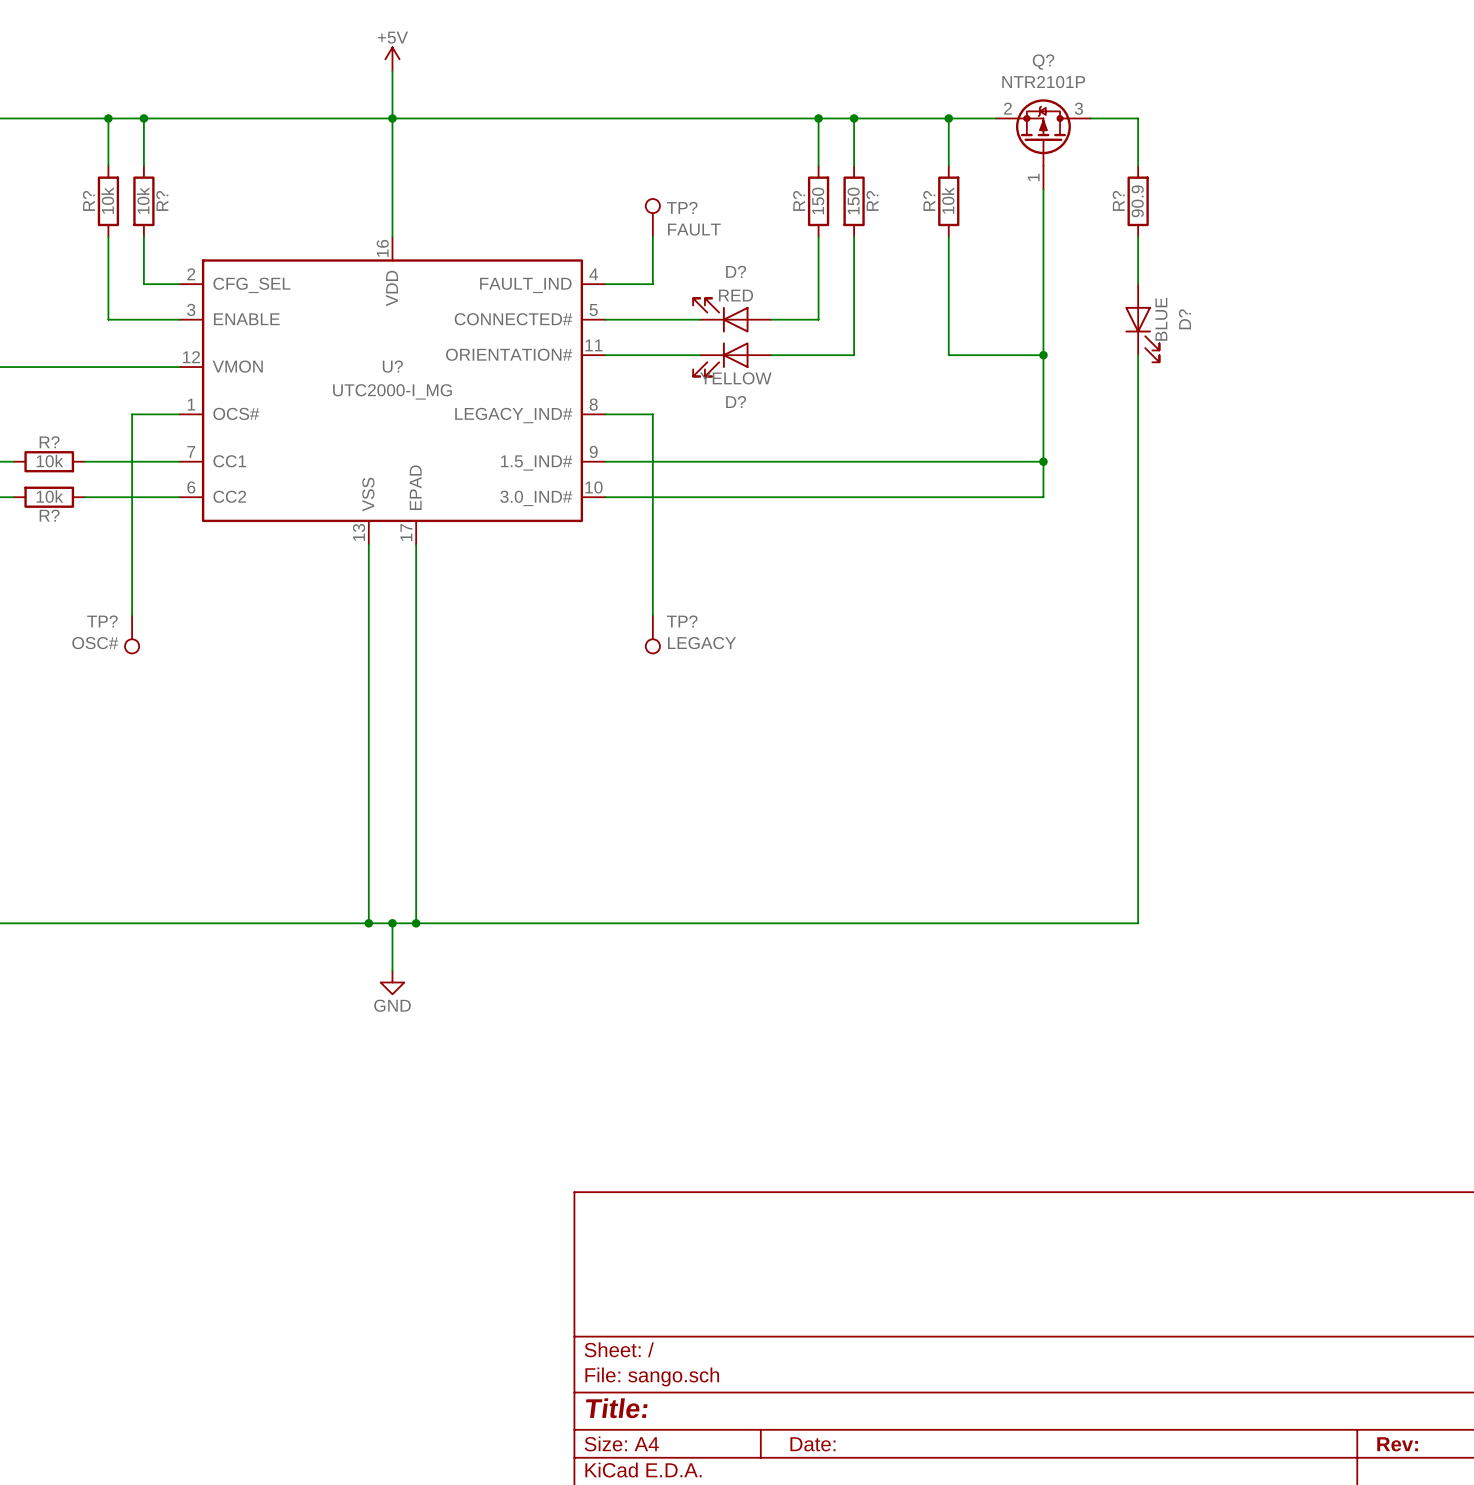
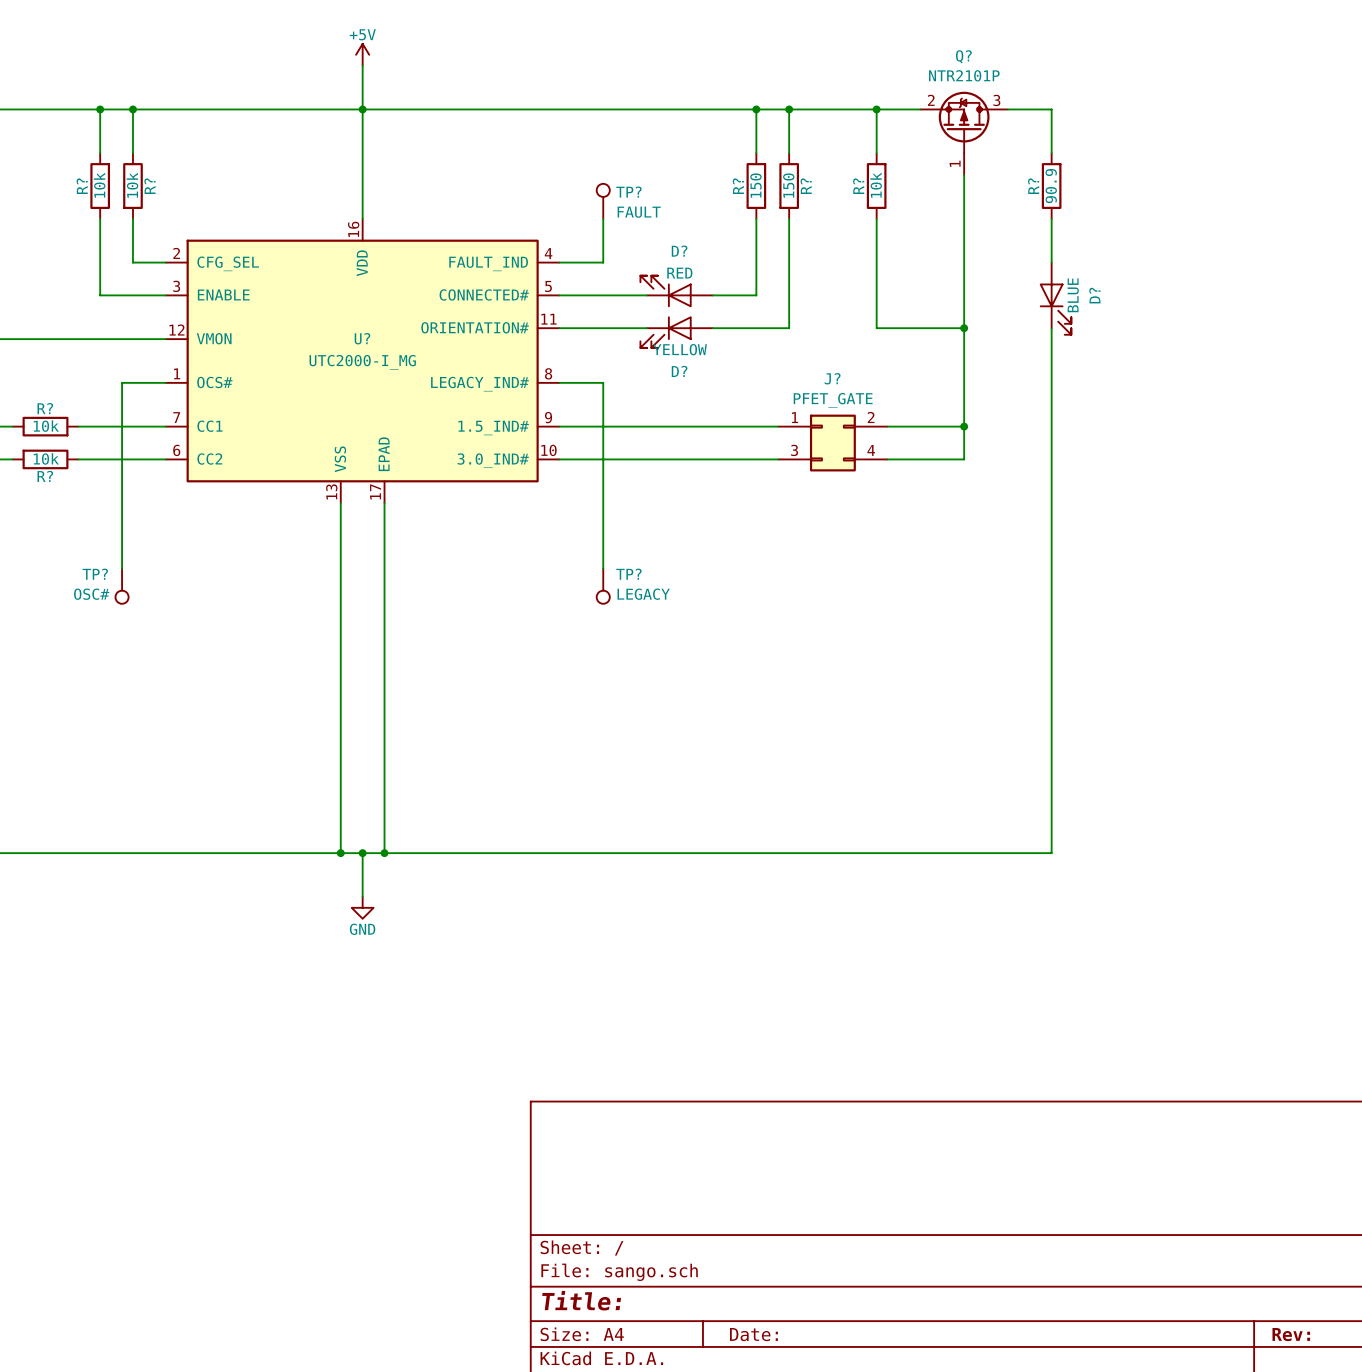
J?: none -> PFET_GATE (832, 443)

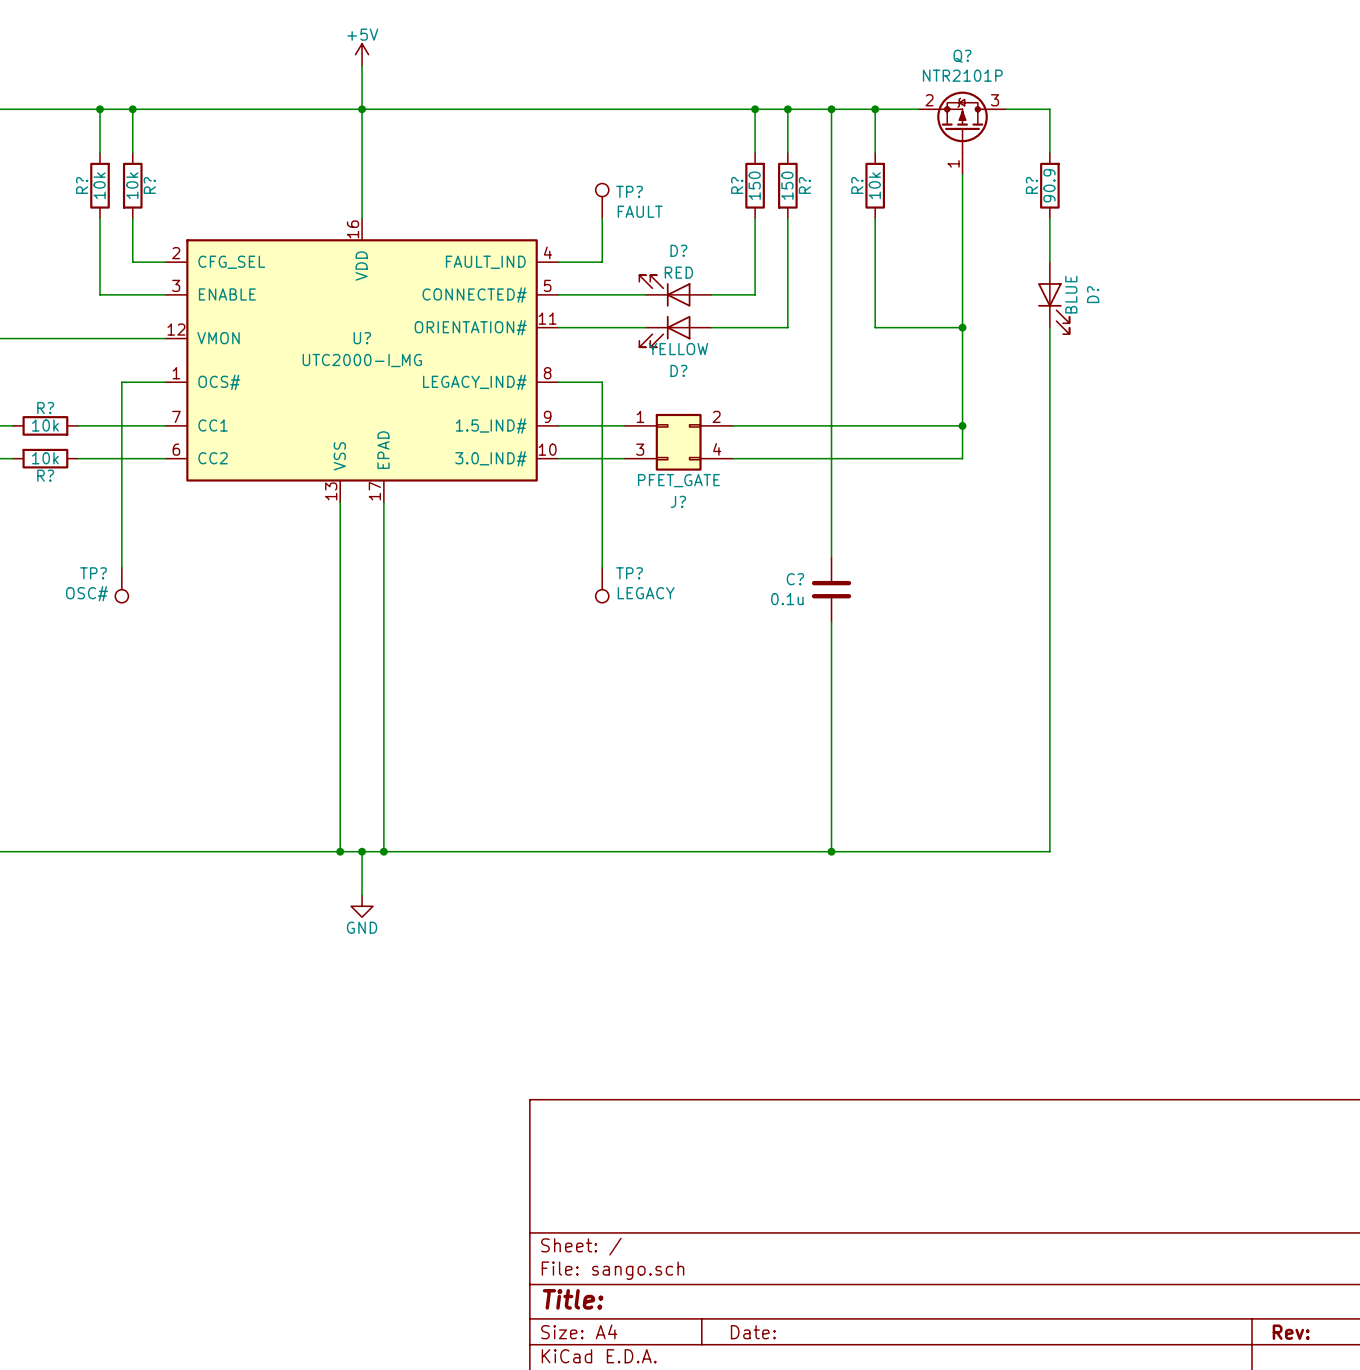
wire: none -> (831, 109) (831, 556)
junction: none -> (831, 109)
J? name position: J? (832, 378) -> J? (678, 501)
J? value position: PFET_GATE (833, 400) -> PFET_GATE (678, 480)
J? position: (832, 443) -> (678, 442)
C?: none -> 0.1u (831, 589)
wire: none -> (831, 622) (831, 851)
junction: none -> (831, 851)

